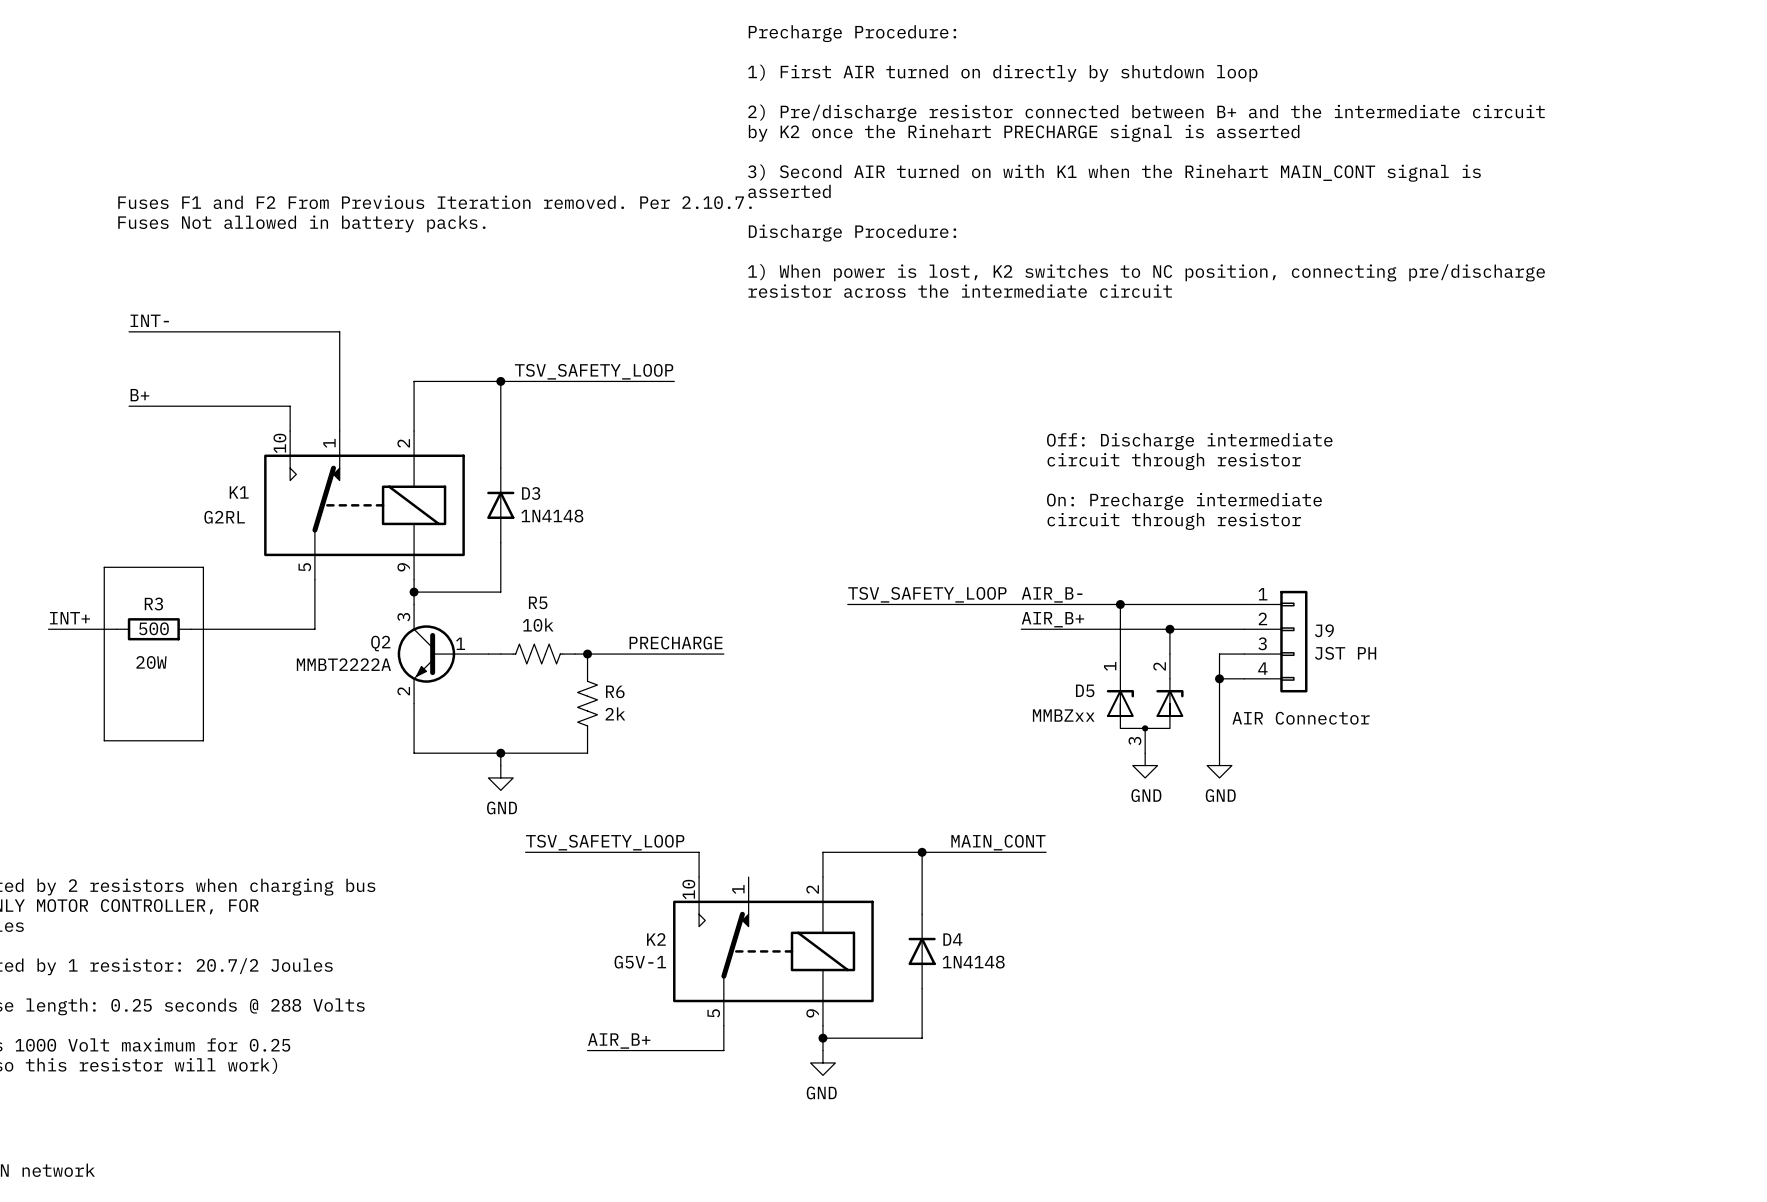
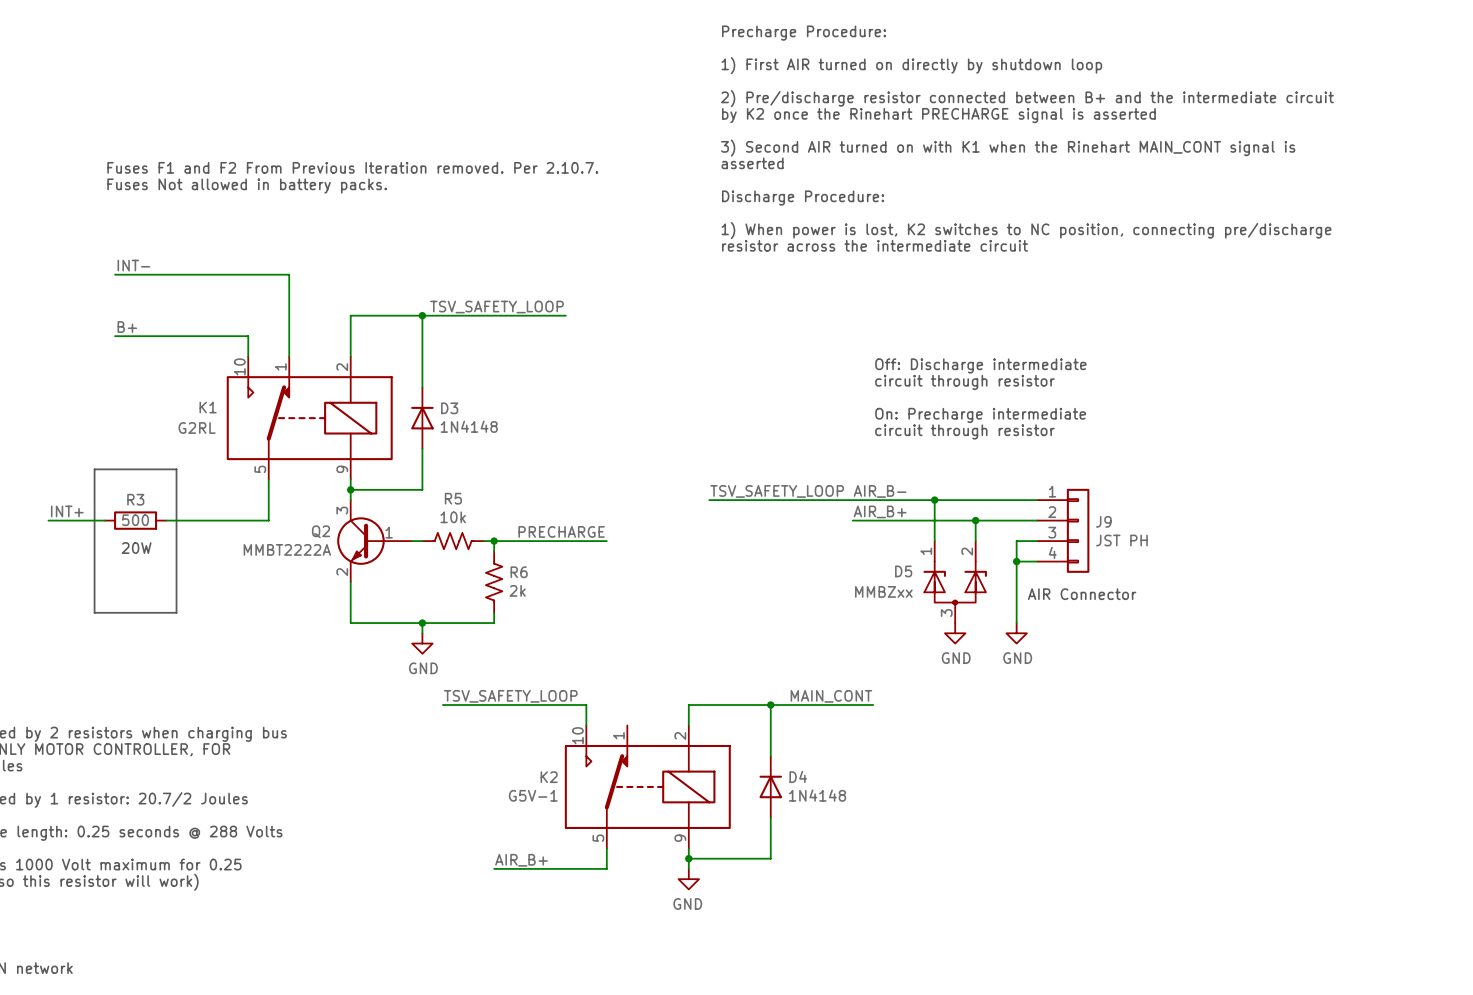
text position: Precharge Procedure: (852, 33) -> Precharge Procedure: (804, 33)
text position: 1) First AIR turned on directly by shutdown loop (1002, 73) -> 1) First AIR turned on directly by shutdown loop (911, 65)
text position: 2) Pre/discharge resistor connected between B+ and the intermediate circuit (1146, 113) -> 2) Pre/discharge resistor connected between B+ and the intermediate circuit (1027, 98)
text position: by K2 once the Rinehart PRECHARGE signal is asserted (1024, 133) -> by K2 once the Rinehart PRECHARGE signal is asserted (938, 115)
text position: 3) Second AIR turned on with K1 when the Rinehart MAIN_CONT signal is (1114, 173) -> 3) Second AIR turned on with K1 when the Rinehart MAIN_CONT signal is (1008, 148)
text position: asserted (789, 191) -> asserted (752, 163)
text position: Discharge Procedure: (852, 233) -> Discharge Procedure: (803, 198)
text position: 1) When power is lost, K2 switches to NC position, connecting pre/discharge (1146, 272) -> 1) When power is lost, K2 switches to NC position, connecting pre/discharge (1026, 230)
text position: resistor across the intermediate circuit (960, 291) -> resistor across the intermediate circuit (875, 245)

